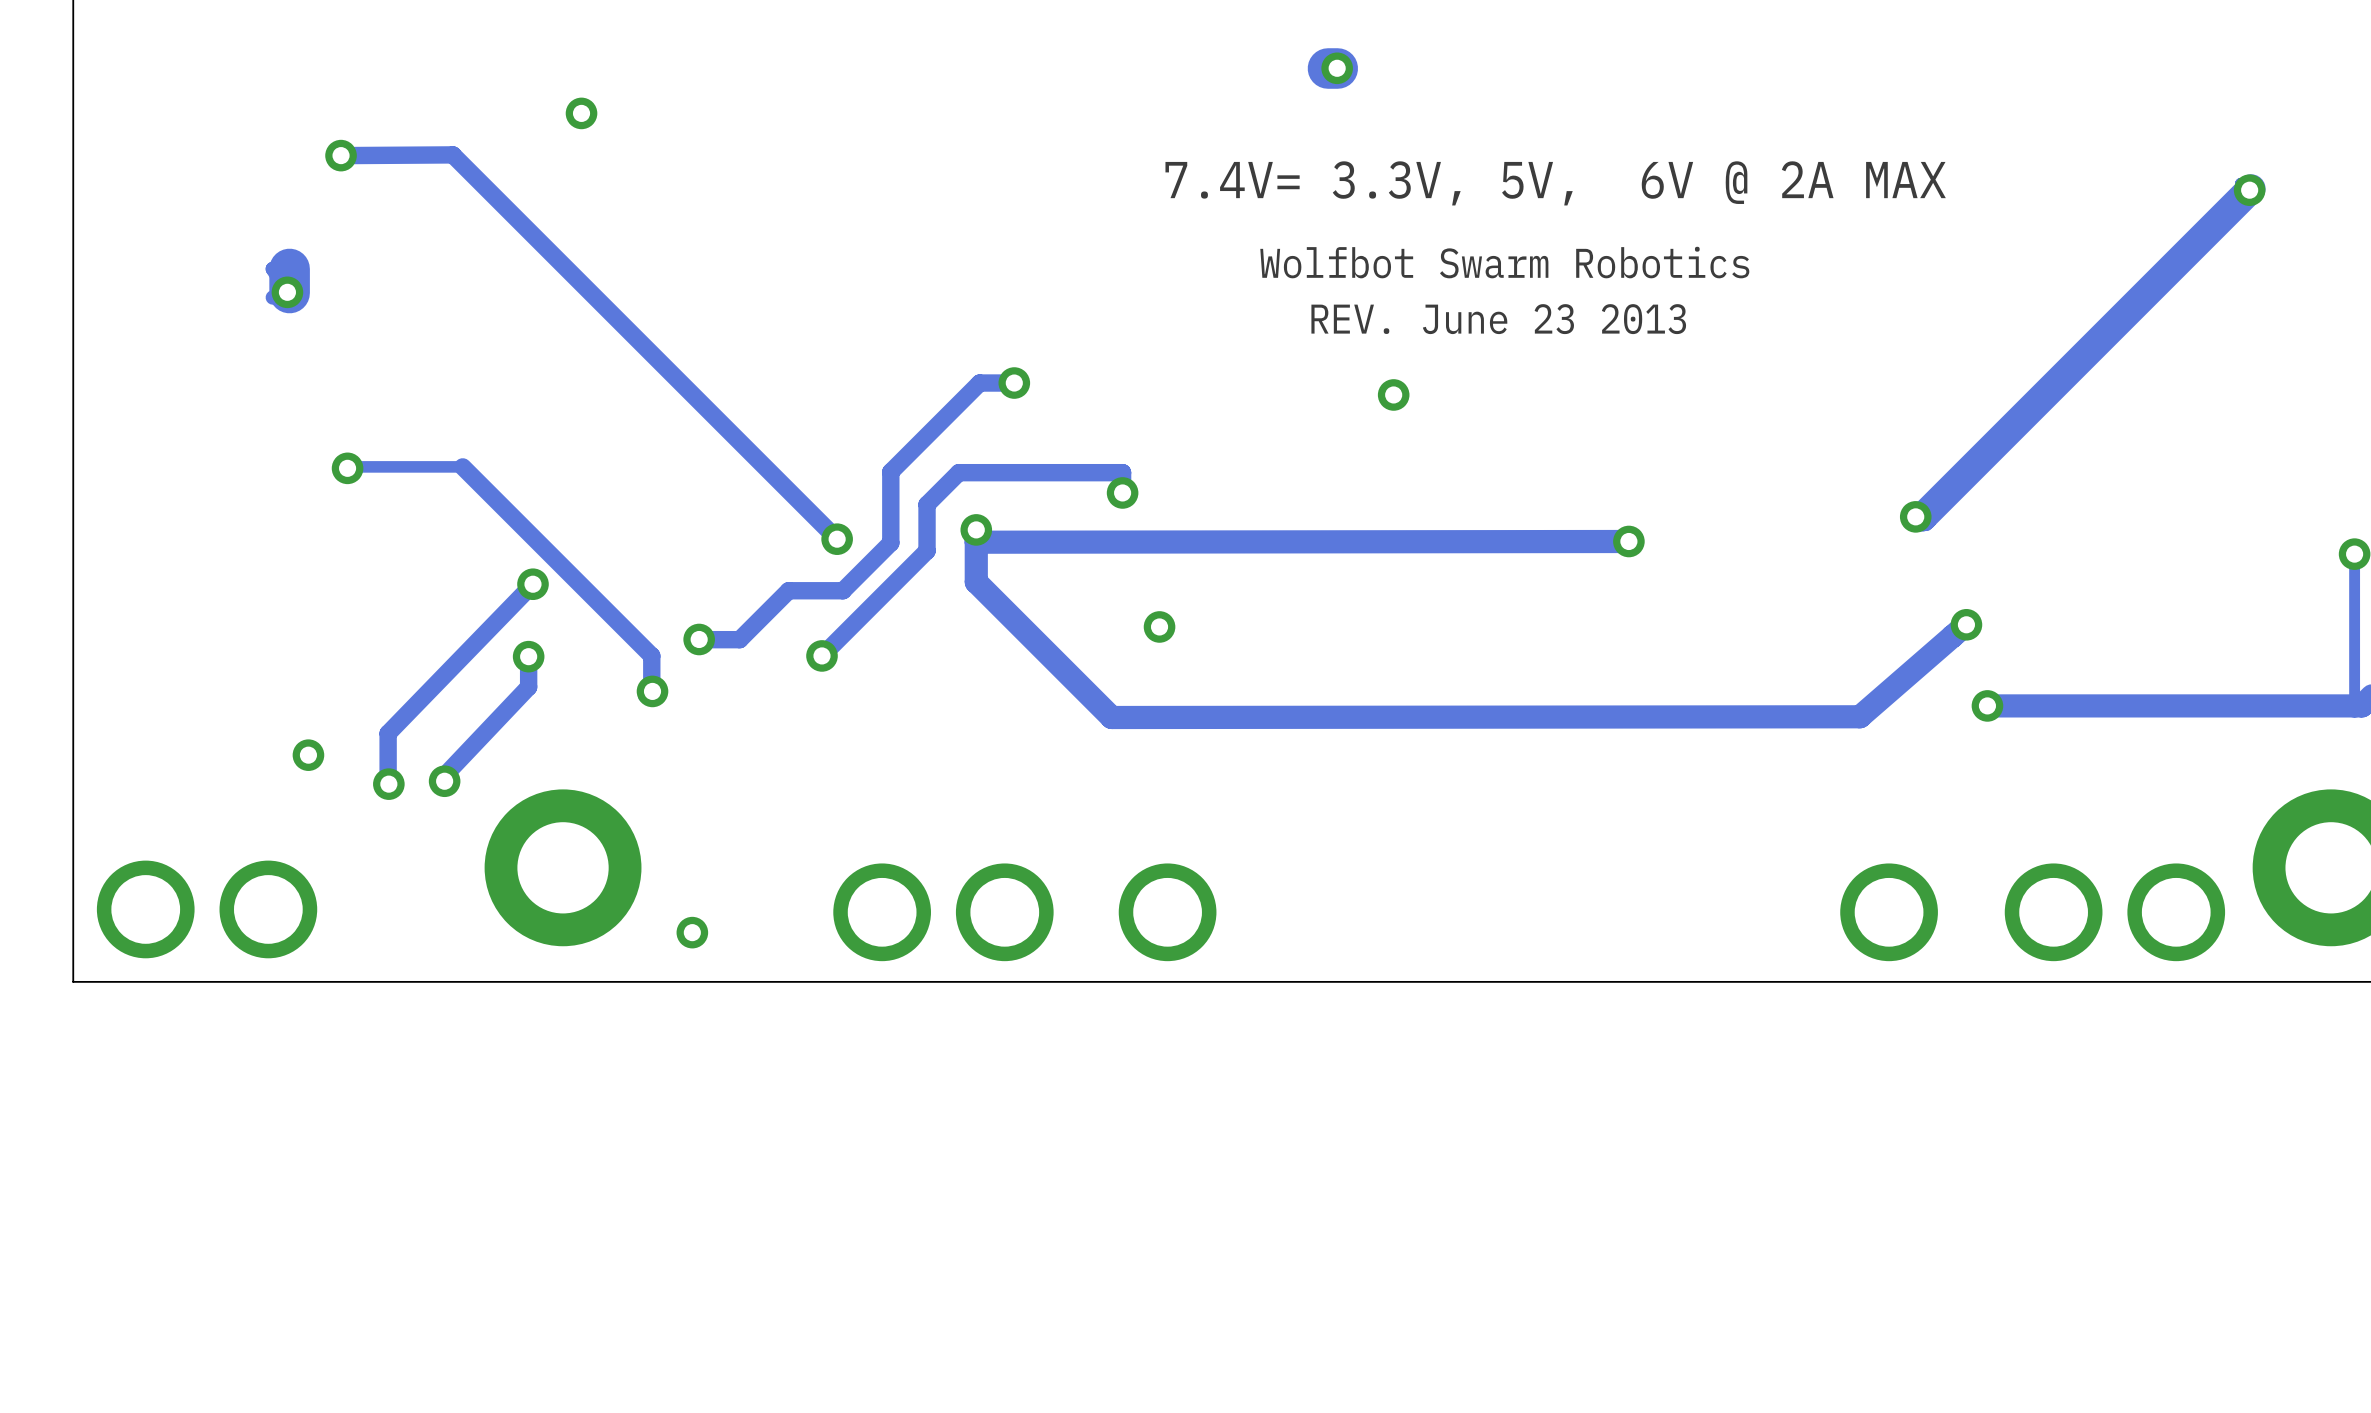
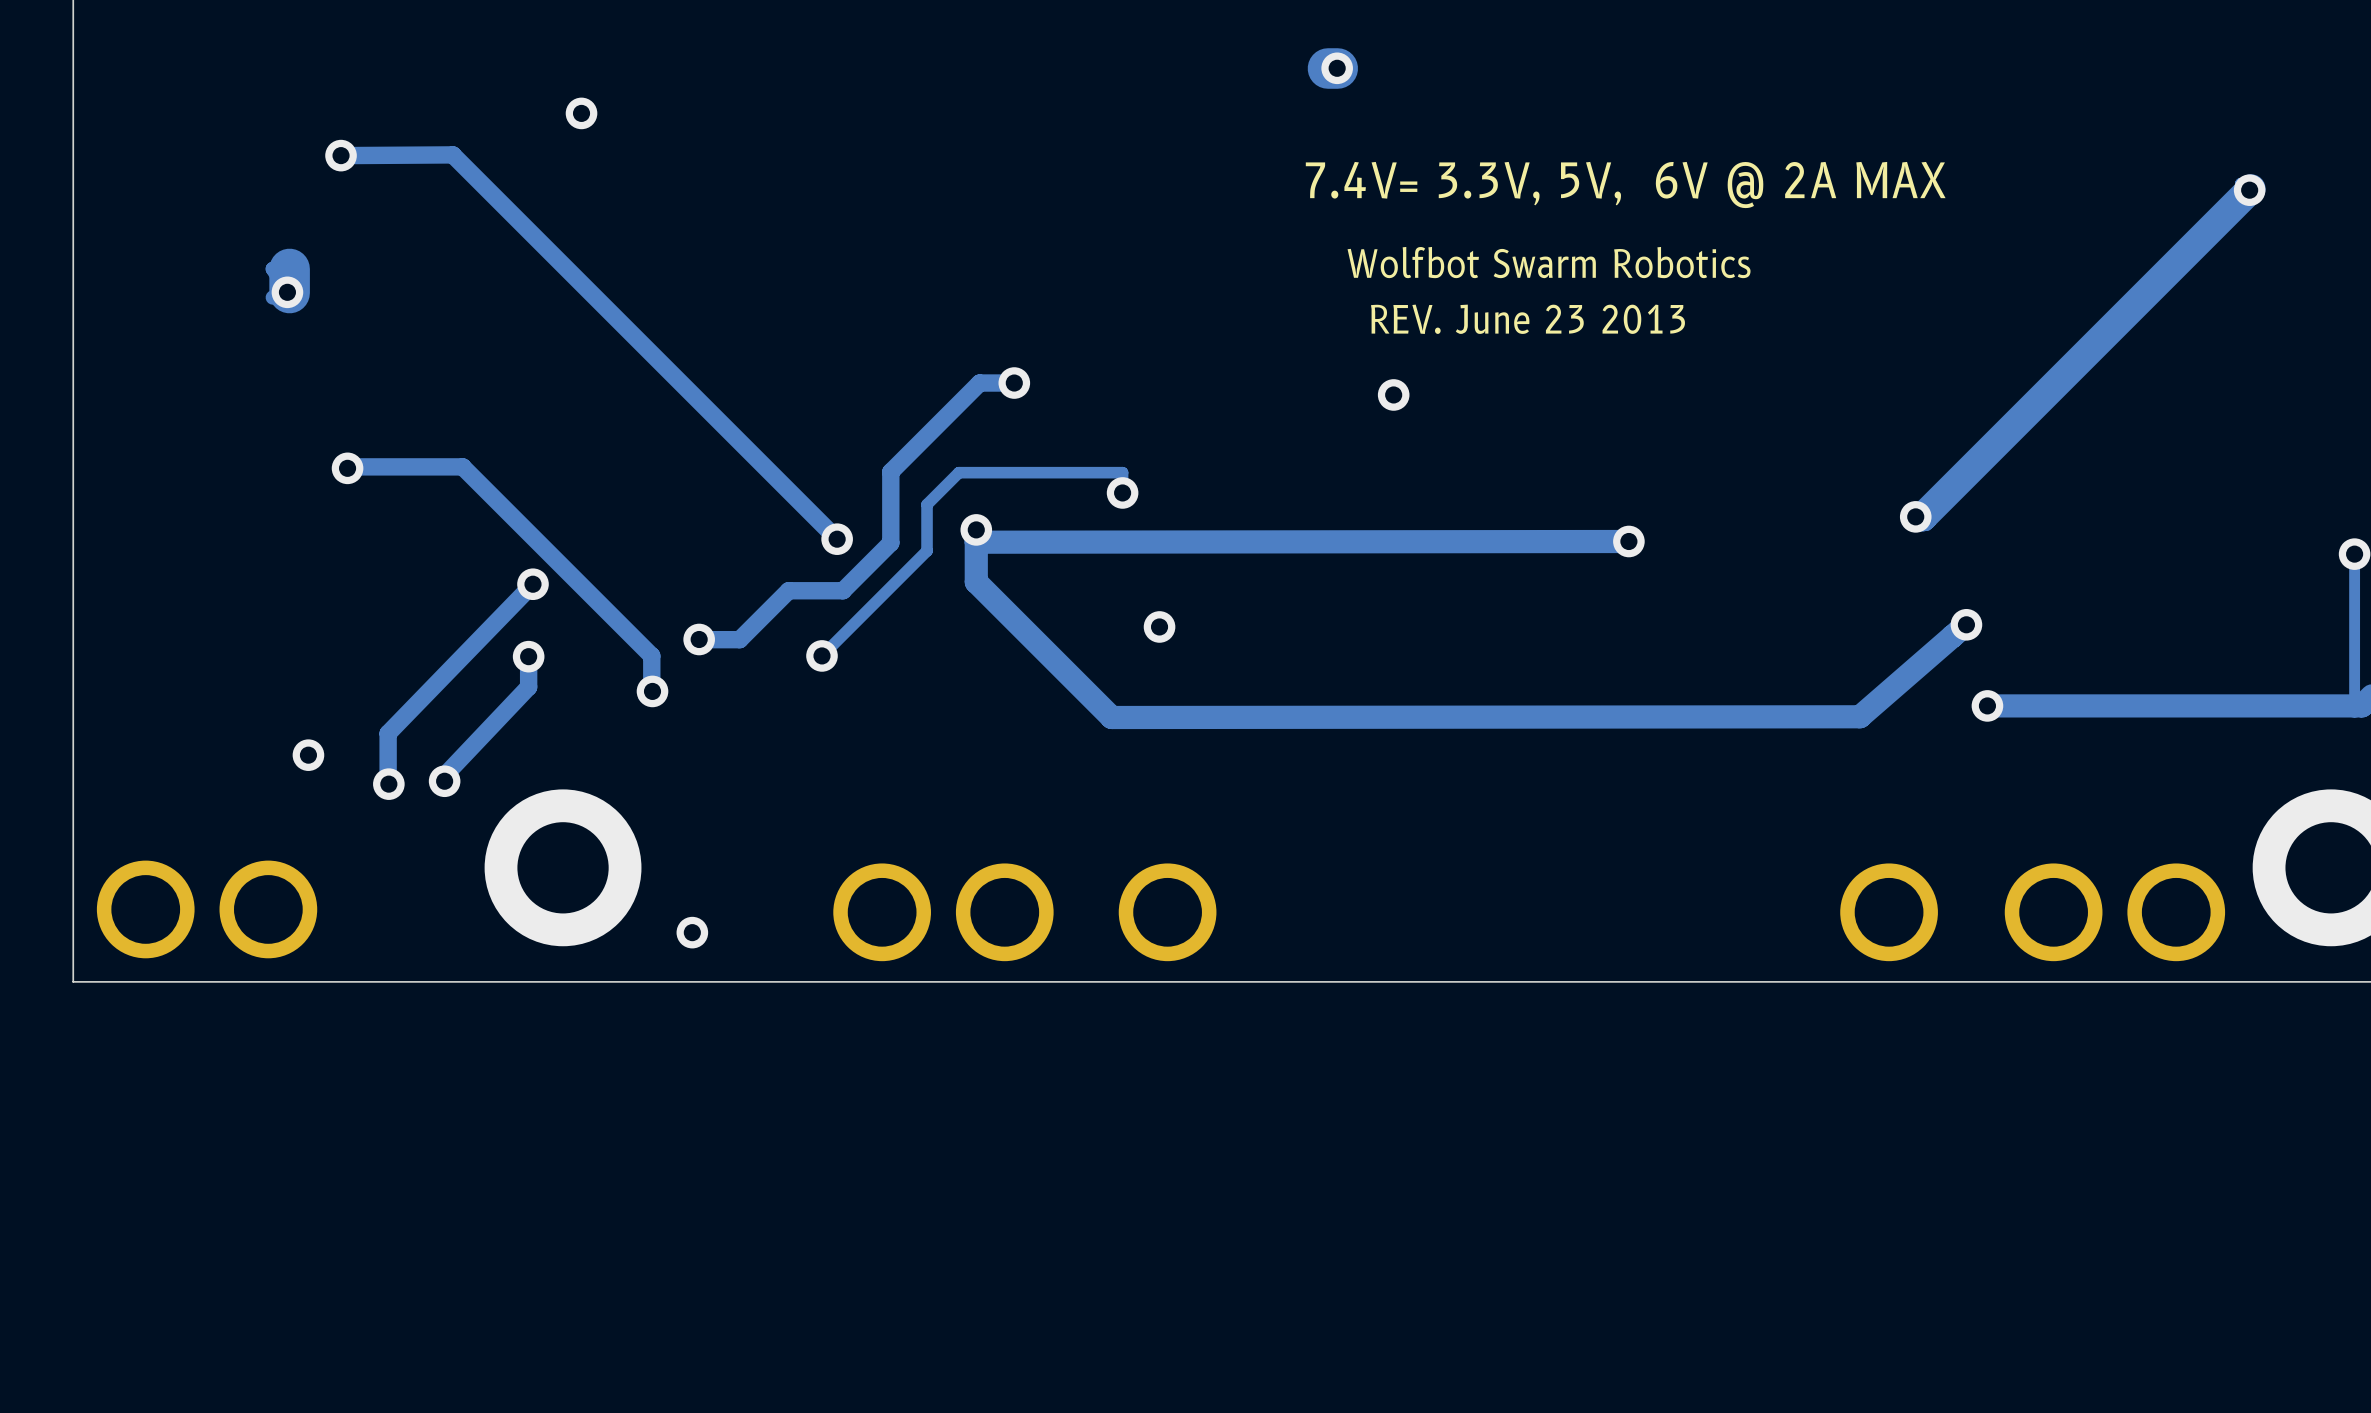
track width: thin (462, 466) (358, 466) -> thick (462, 466) (358, 466)
track width: thick (1122, 492) (1122, 472) (958, 472) (927, 504) (927, 550) (822, 655) -> thin (1122, 492) (1122, 472) (958, 472) (927, 504) (927, 550) (822, 655)

